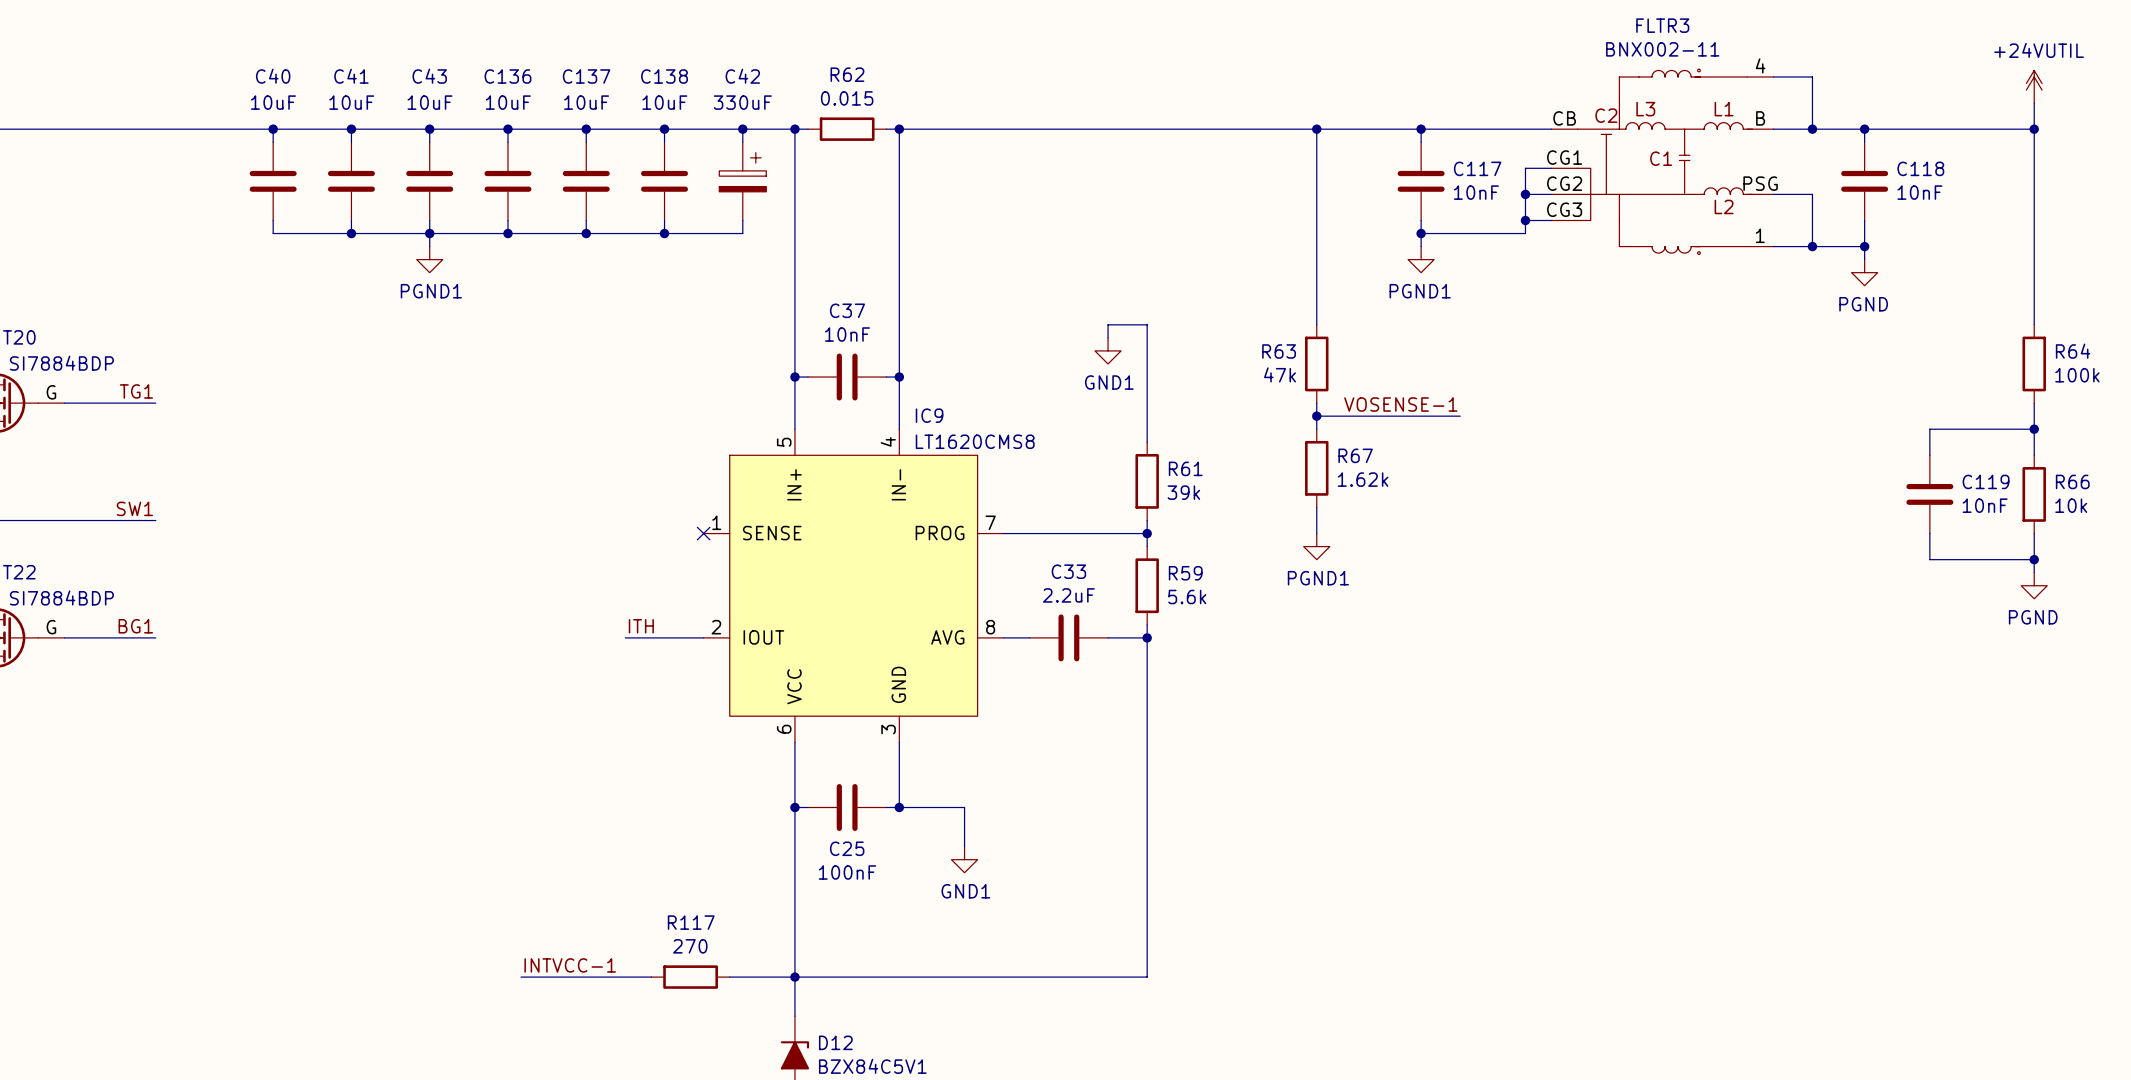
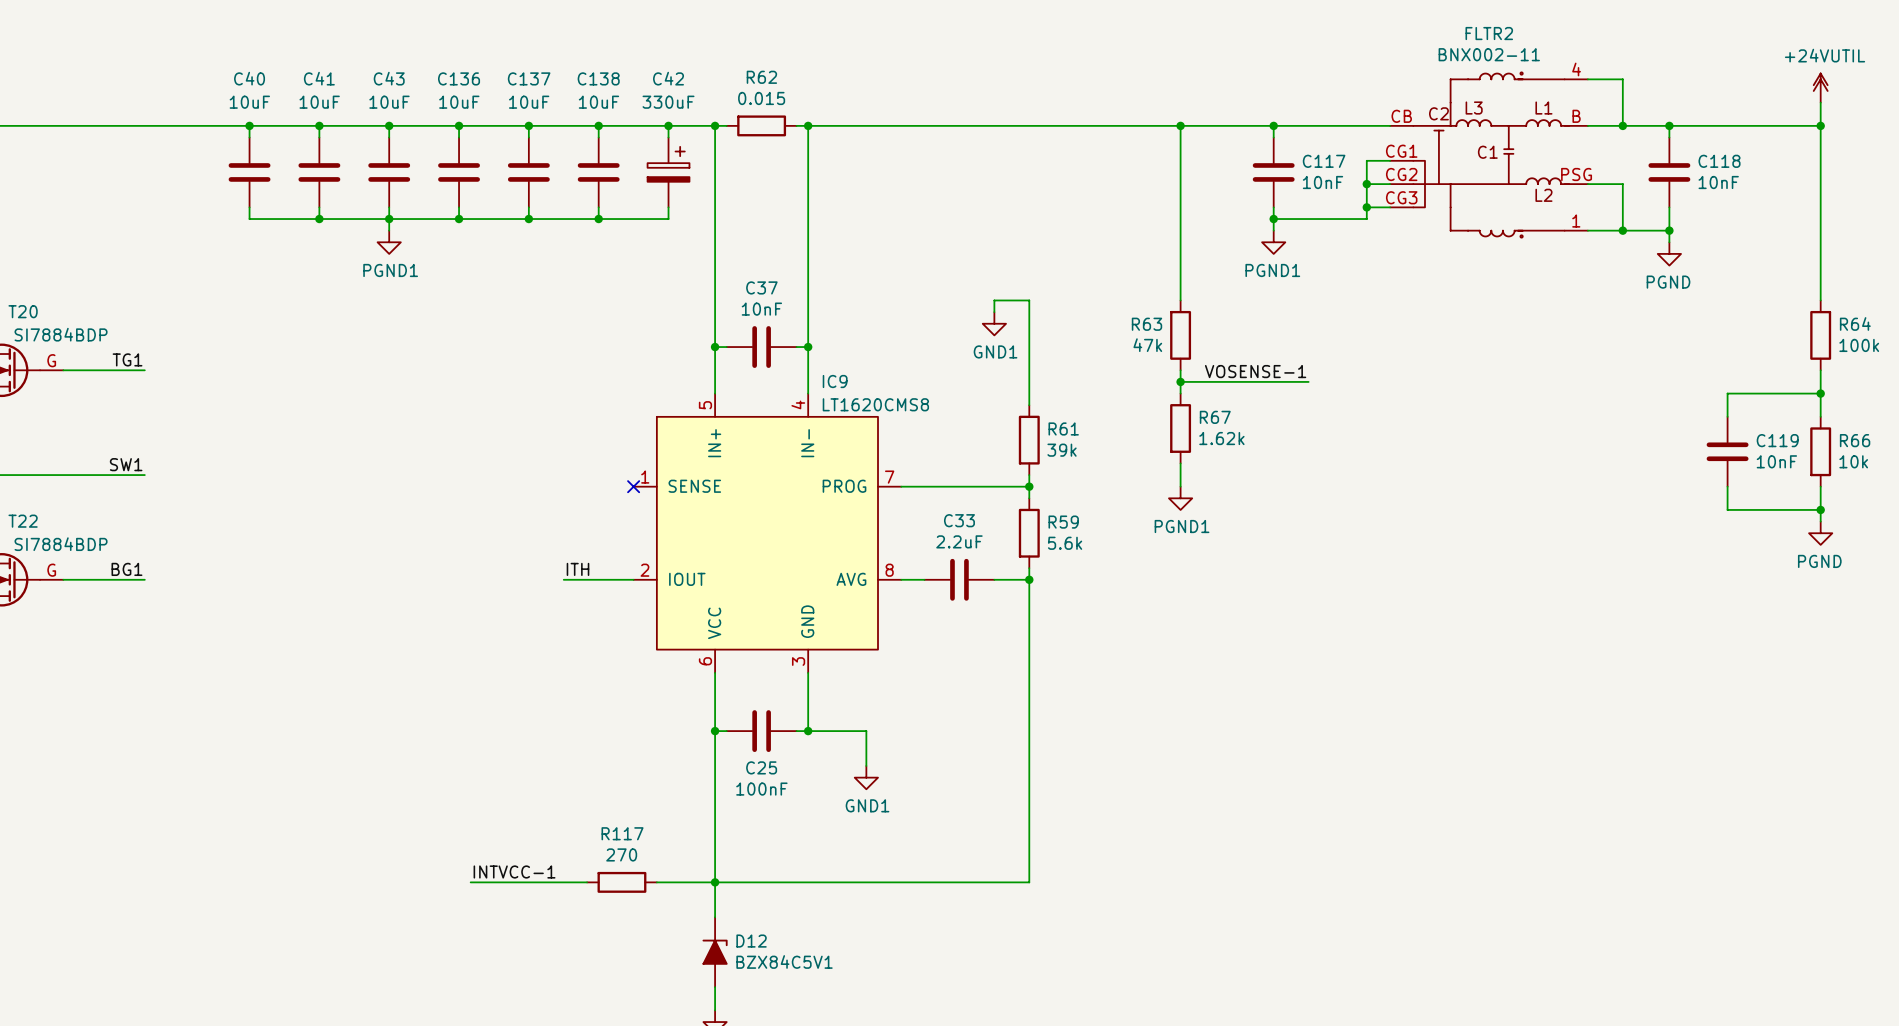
FLTR3 name: FLTR3 (1662, 25) -> FLTR2 (1489, 33)

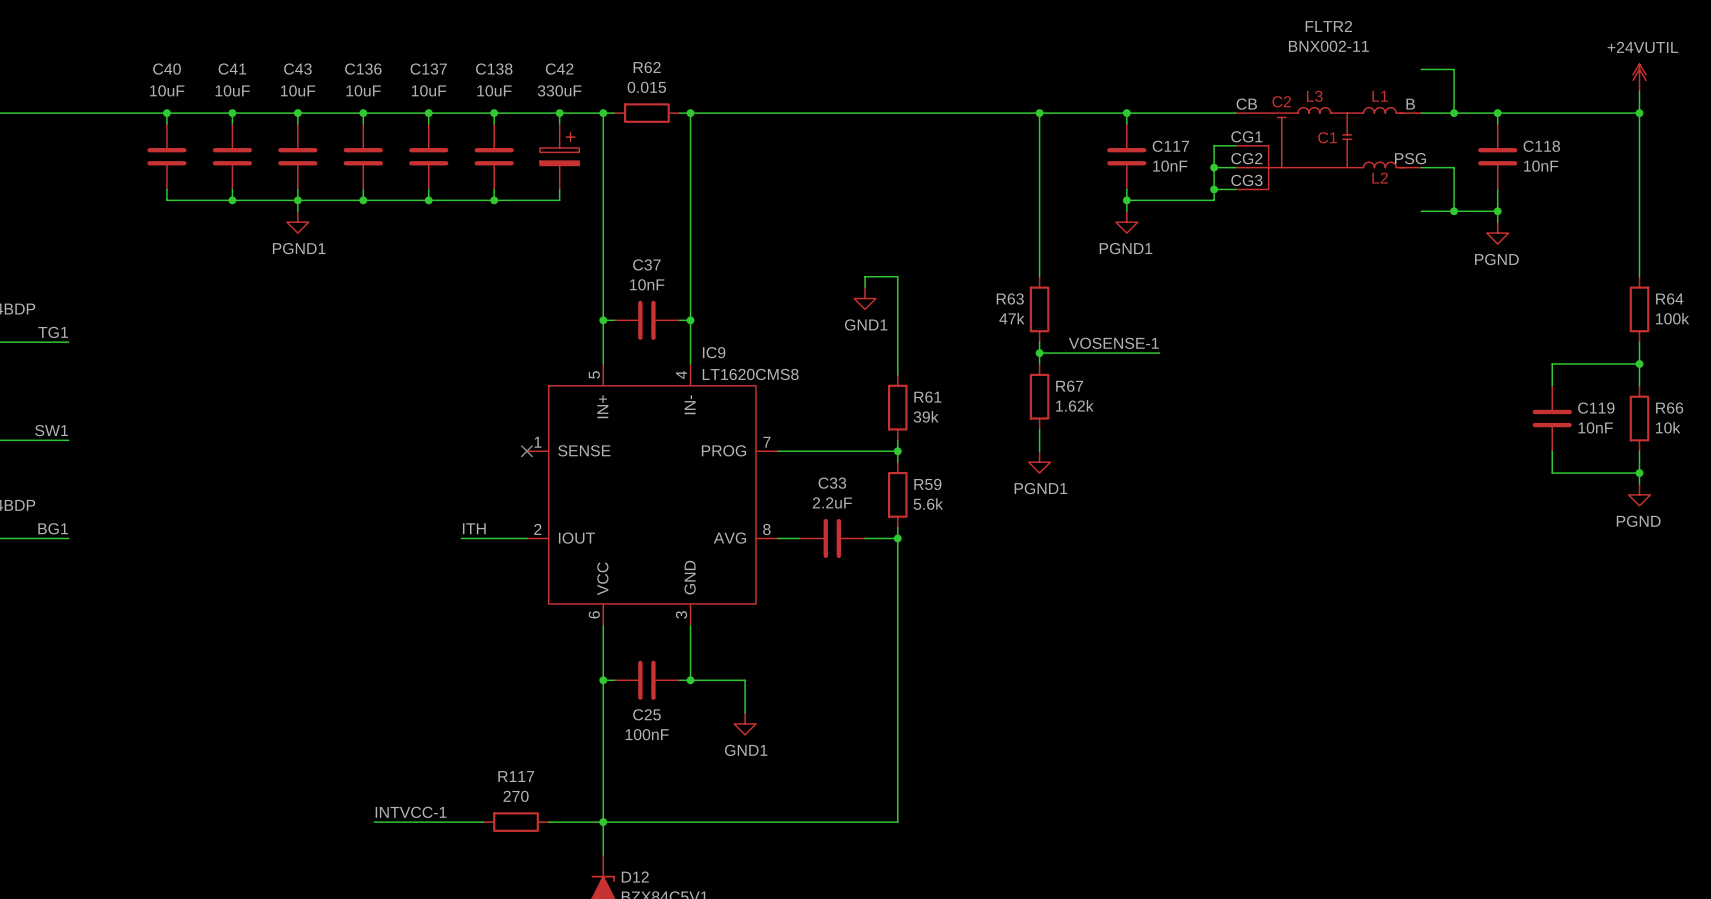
FLTR2 symbol: [1390, 72, 1588, 238] -> [1235, 107, 1422, 190]

